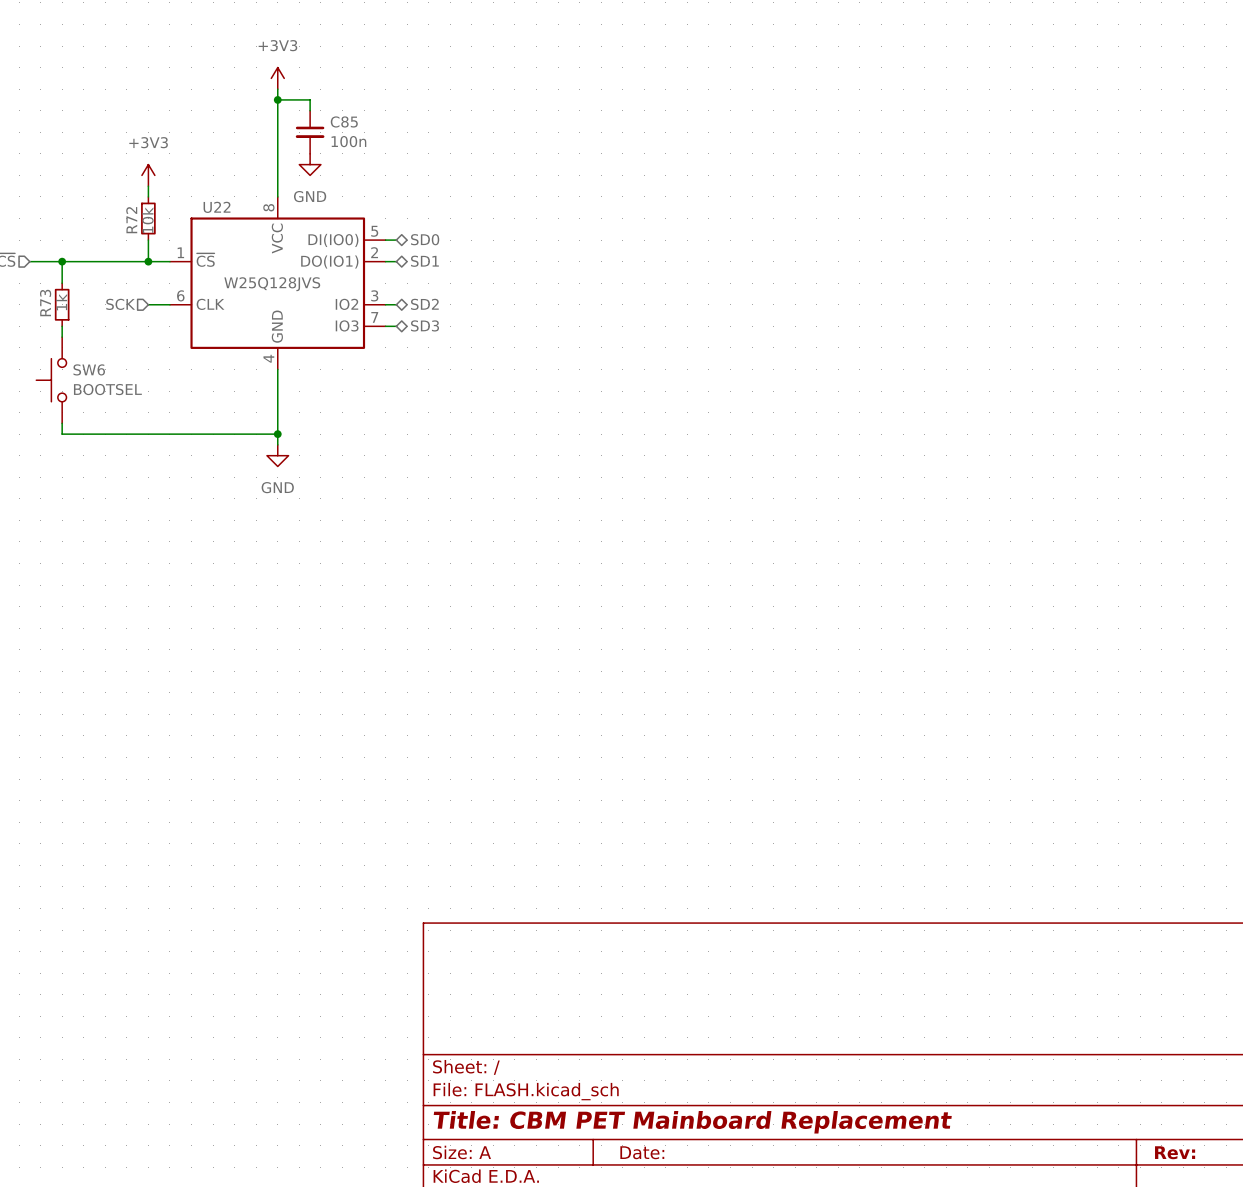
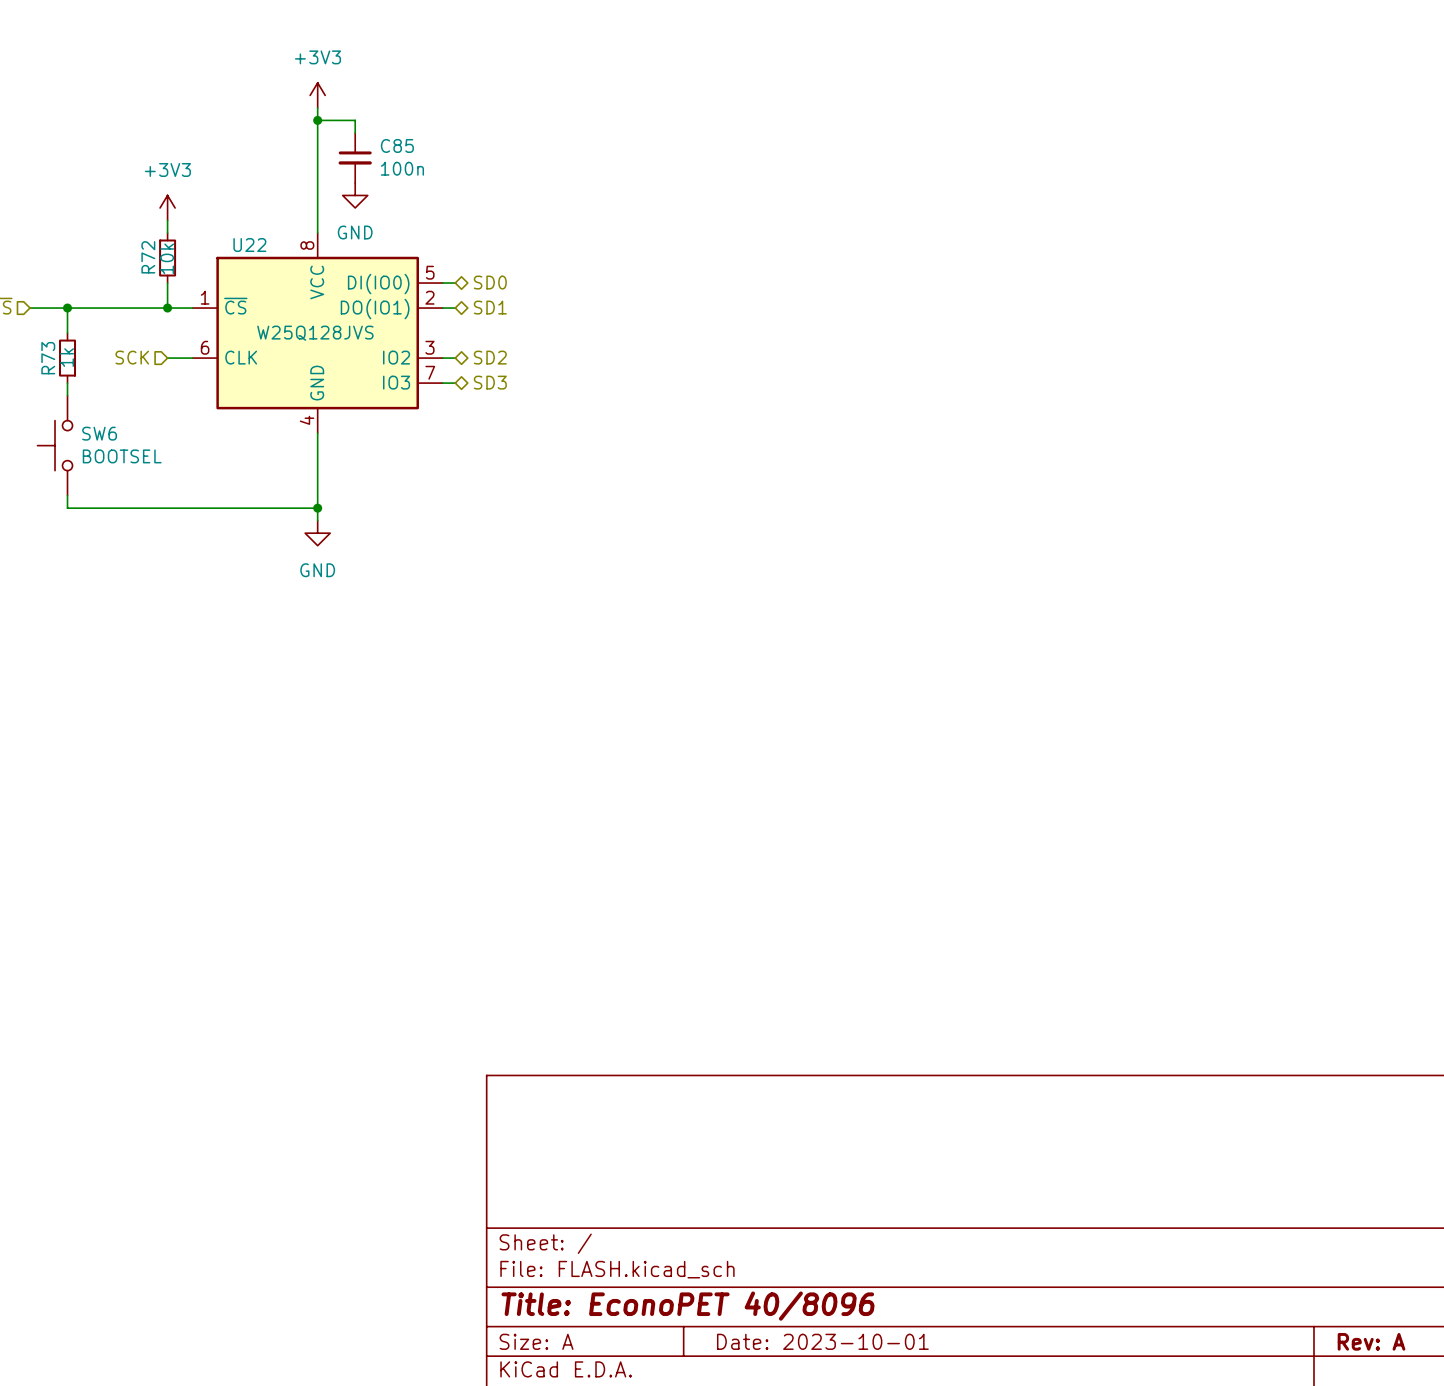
title block: Title: CBM PET Mainboard Replacement (692, 1122) -> Title: EconoPET 40/8096 (688, 1306)
title block: Date: (642, 1152) -> Date: 2023-10-01 (822, 1341)
title block: Rev: (1175, 1152) -> Rev: A (1371, 1341)

